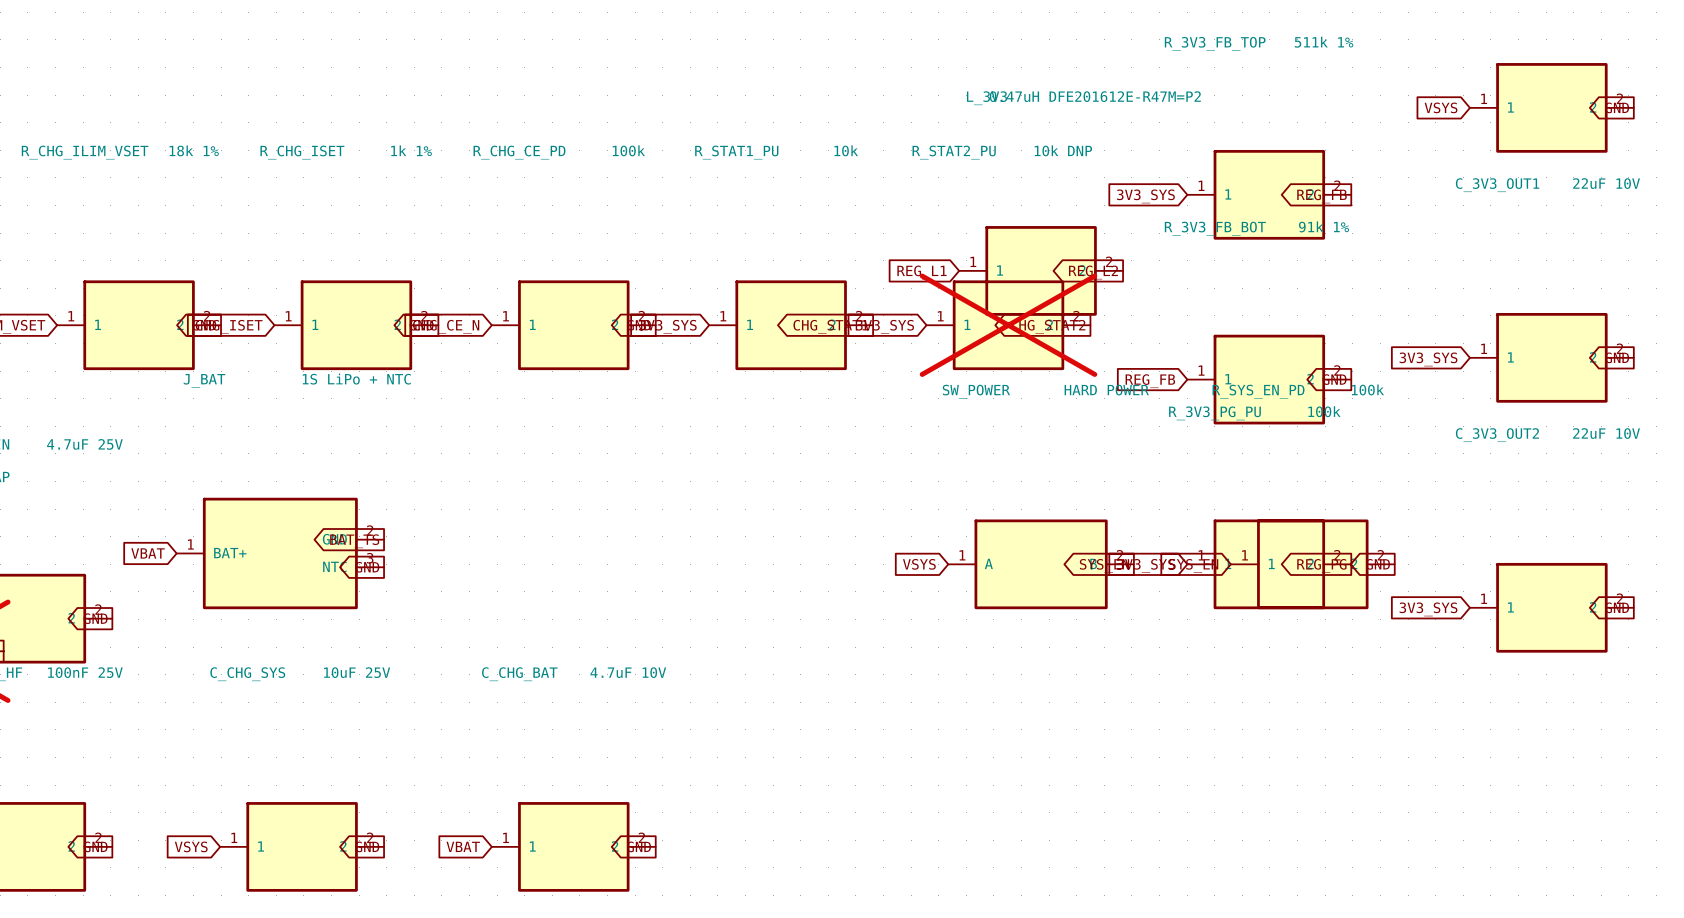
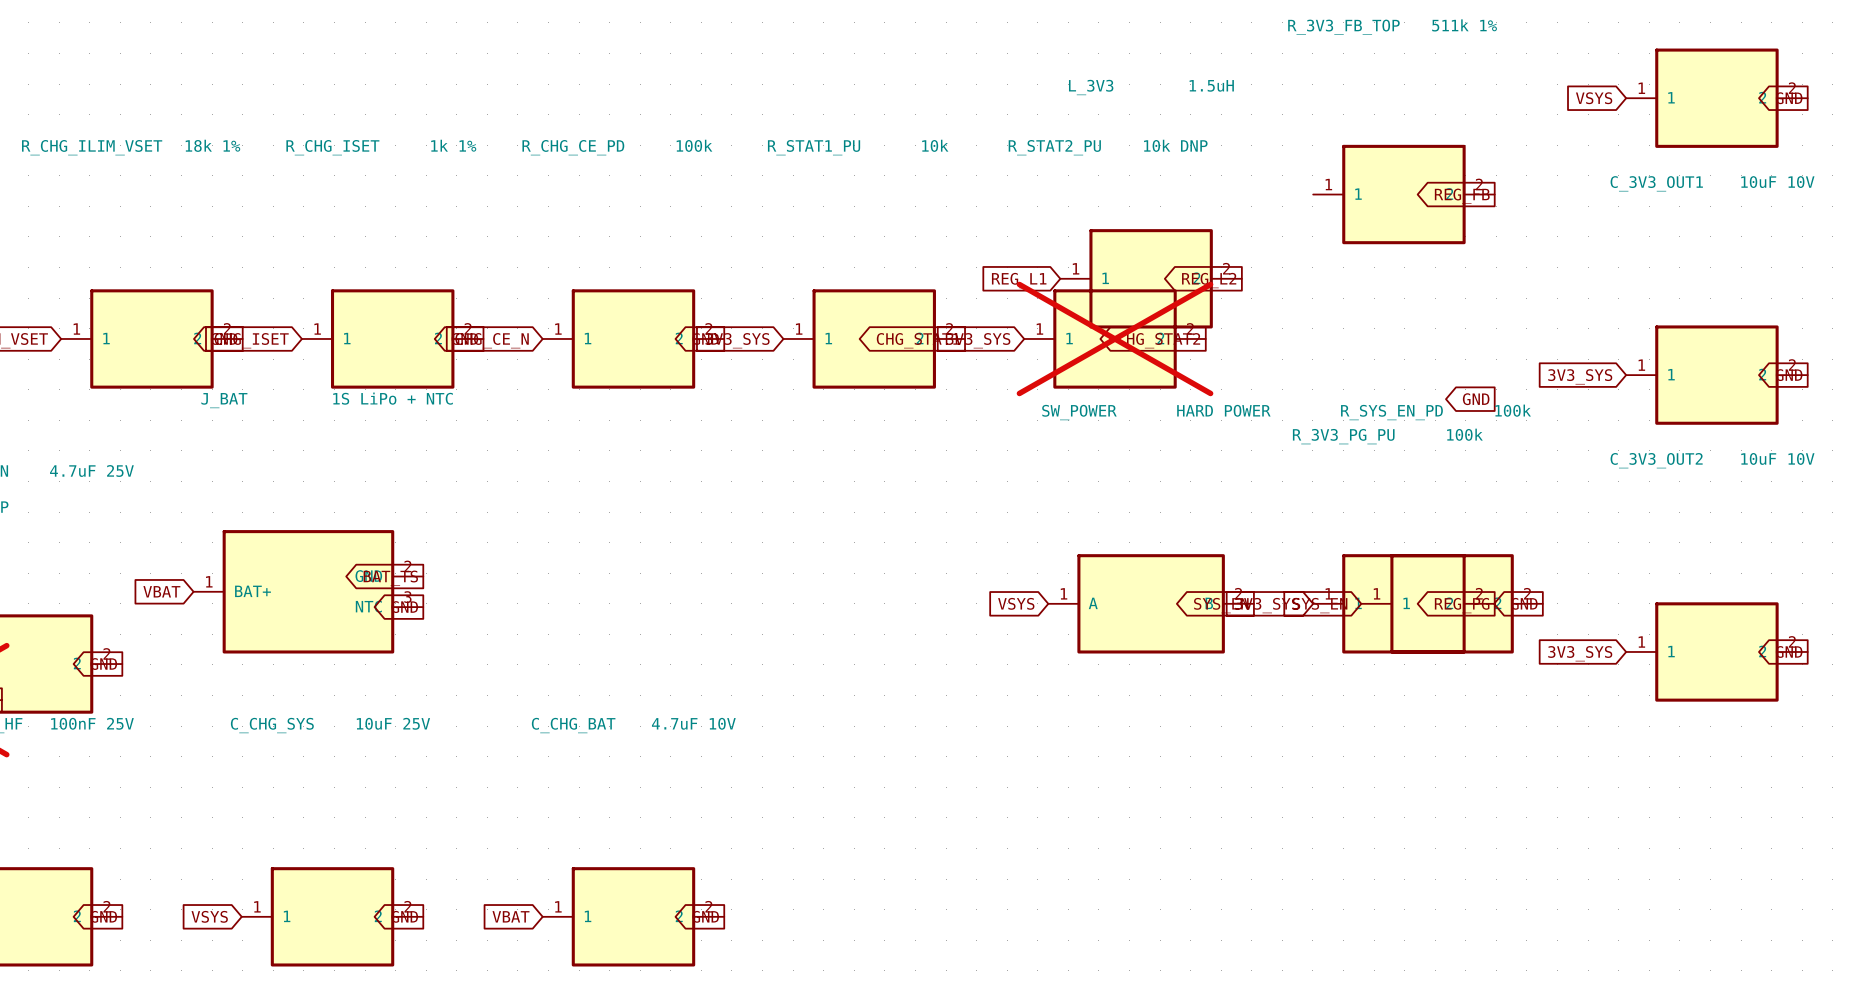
L_3V3 value: 0.47uH DFE201612E-R47M=P2 (1095, 96) -> 1.5uH (1211, 85)
C_3V3_OUT1 value: 22uF 10V (1606, 183) -> 10uF 10V (1777, 182)
global label: 3V3_SYS (1145, 196) -> none
R_3V3_FB_BOT: 91k 1% (1269, 379) -> none
global label: REG_FB (1150, 381) -> none
C_3V3_OUT2 value: 22uF 10V (1606, 433) -> 10uF 10V (1777, 458)

